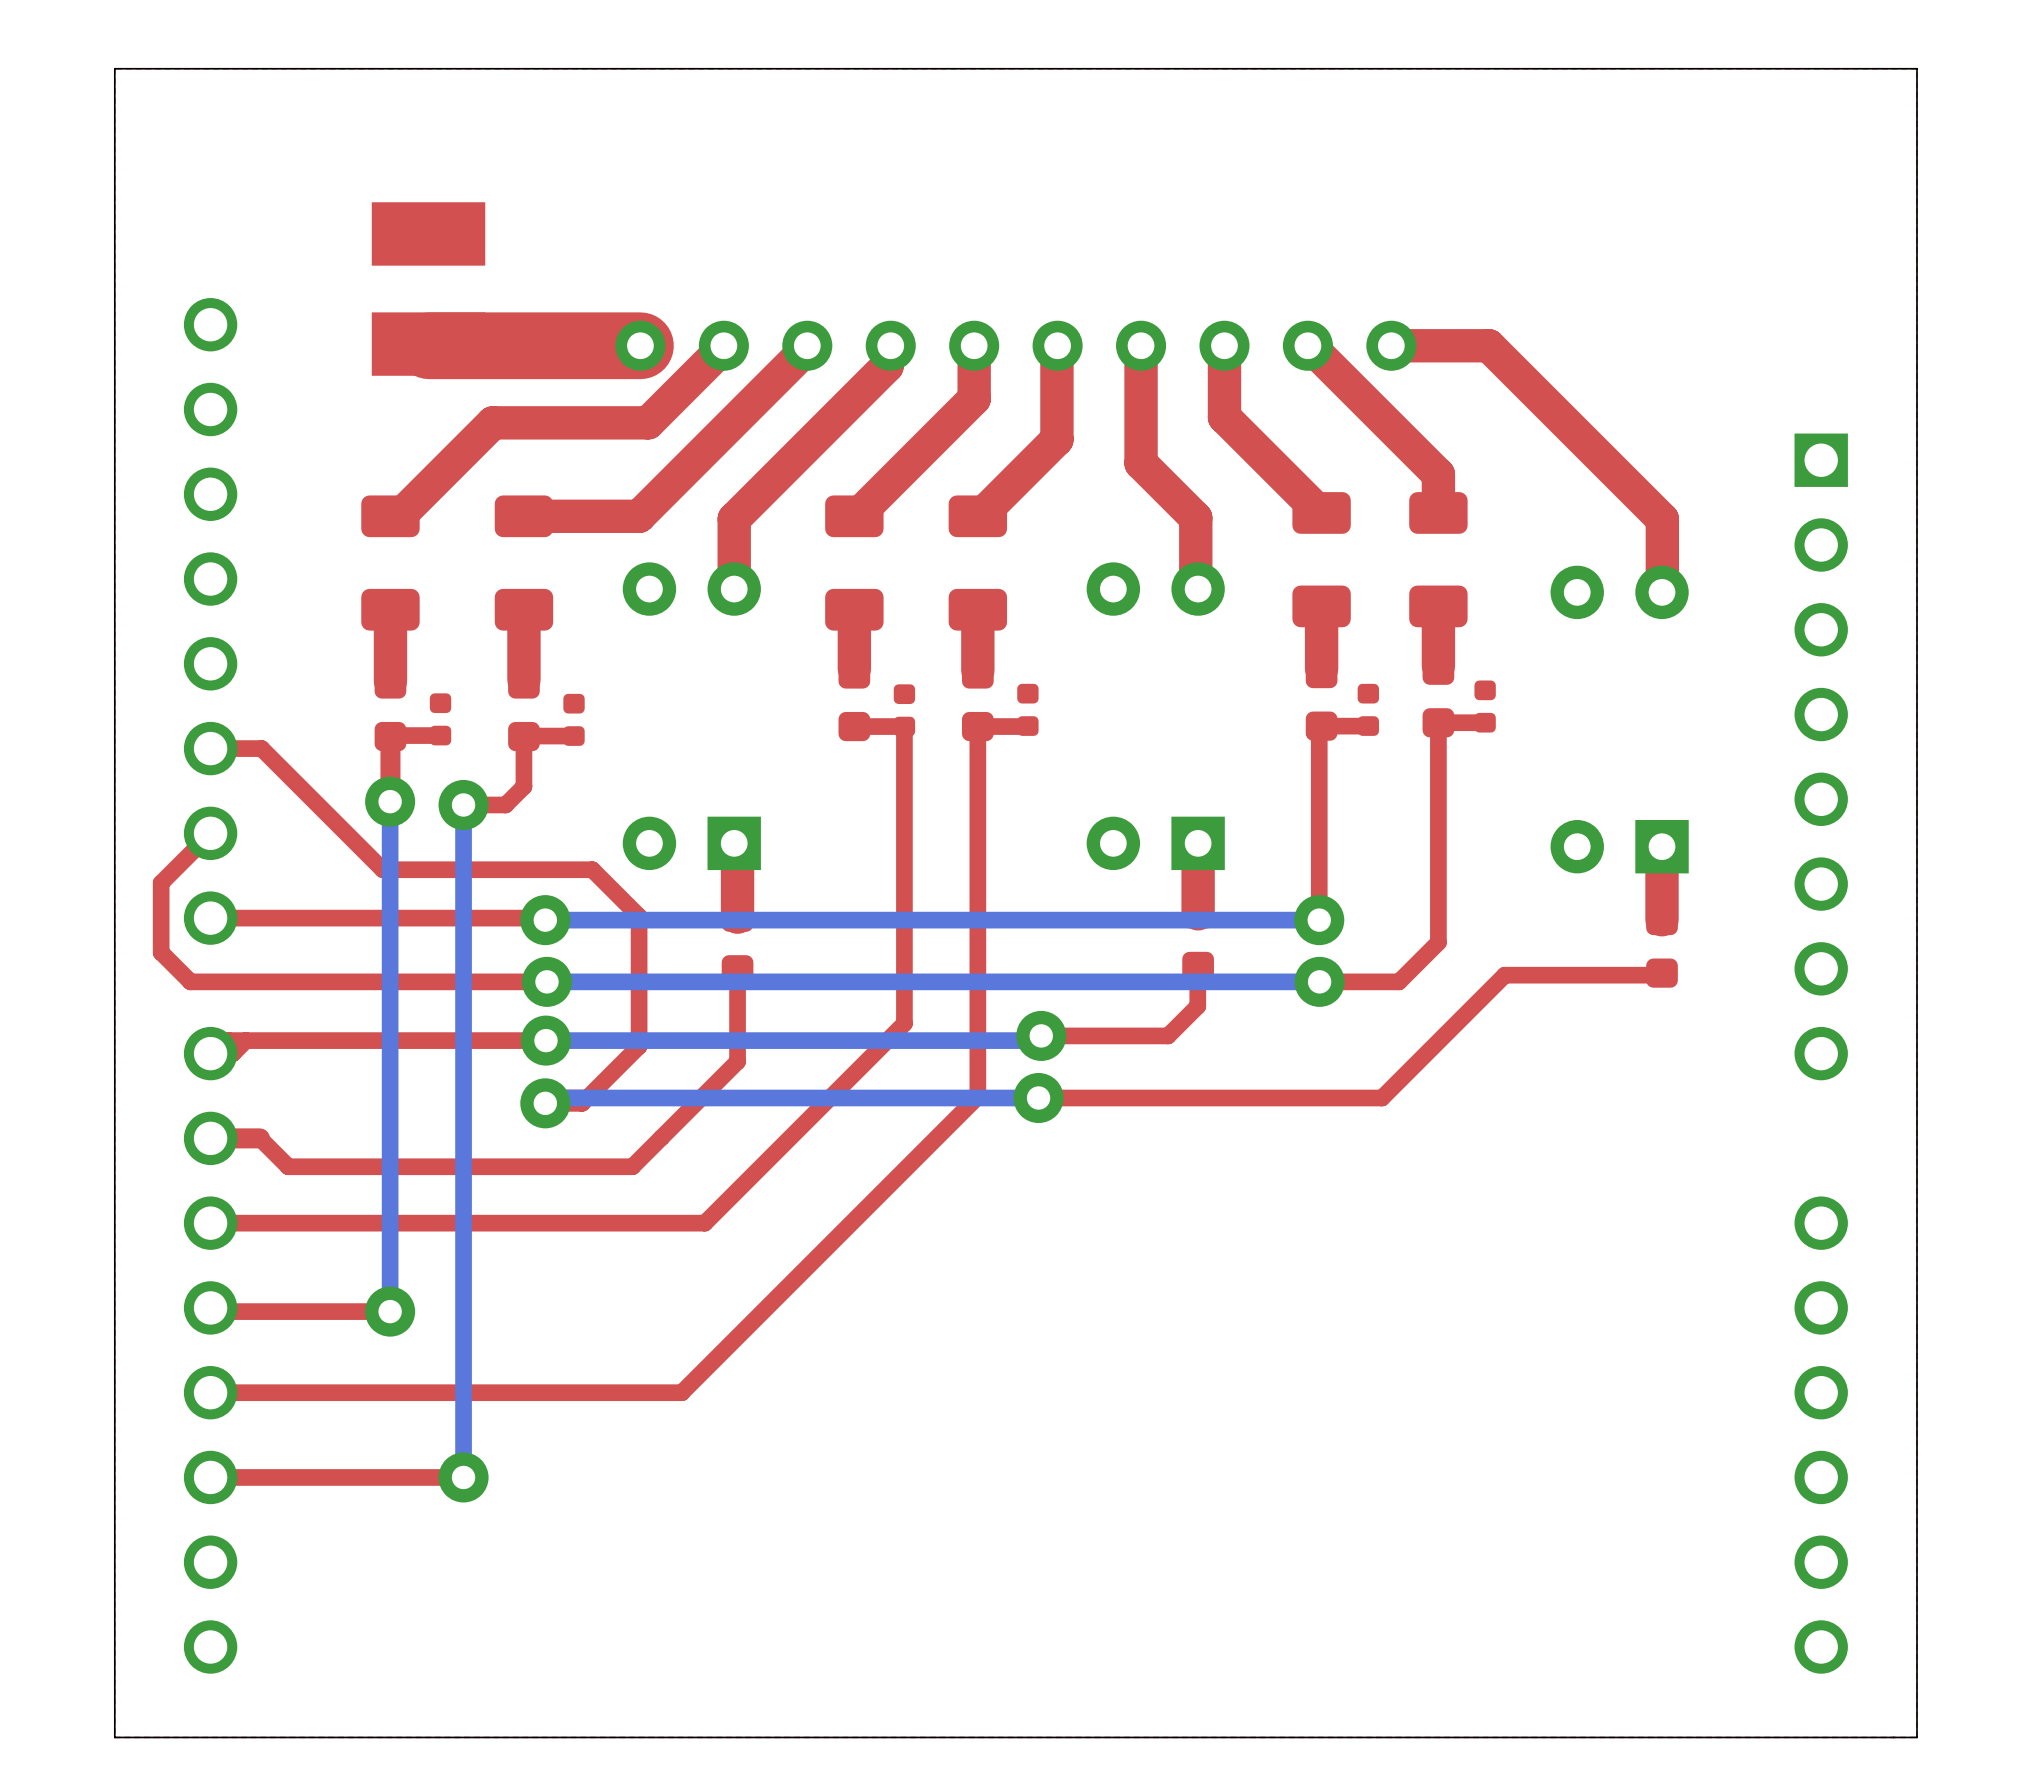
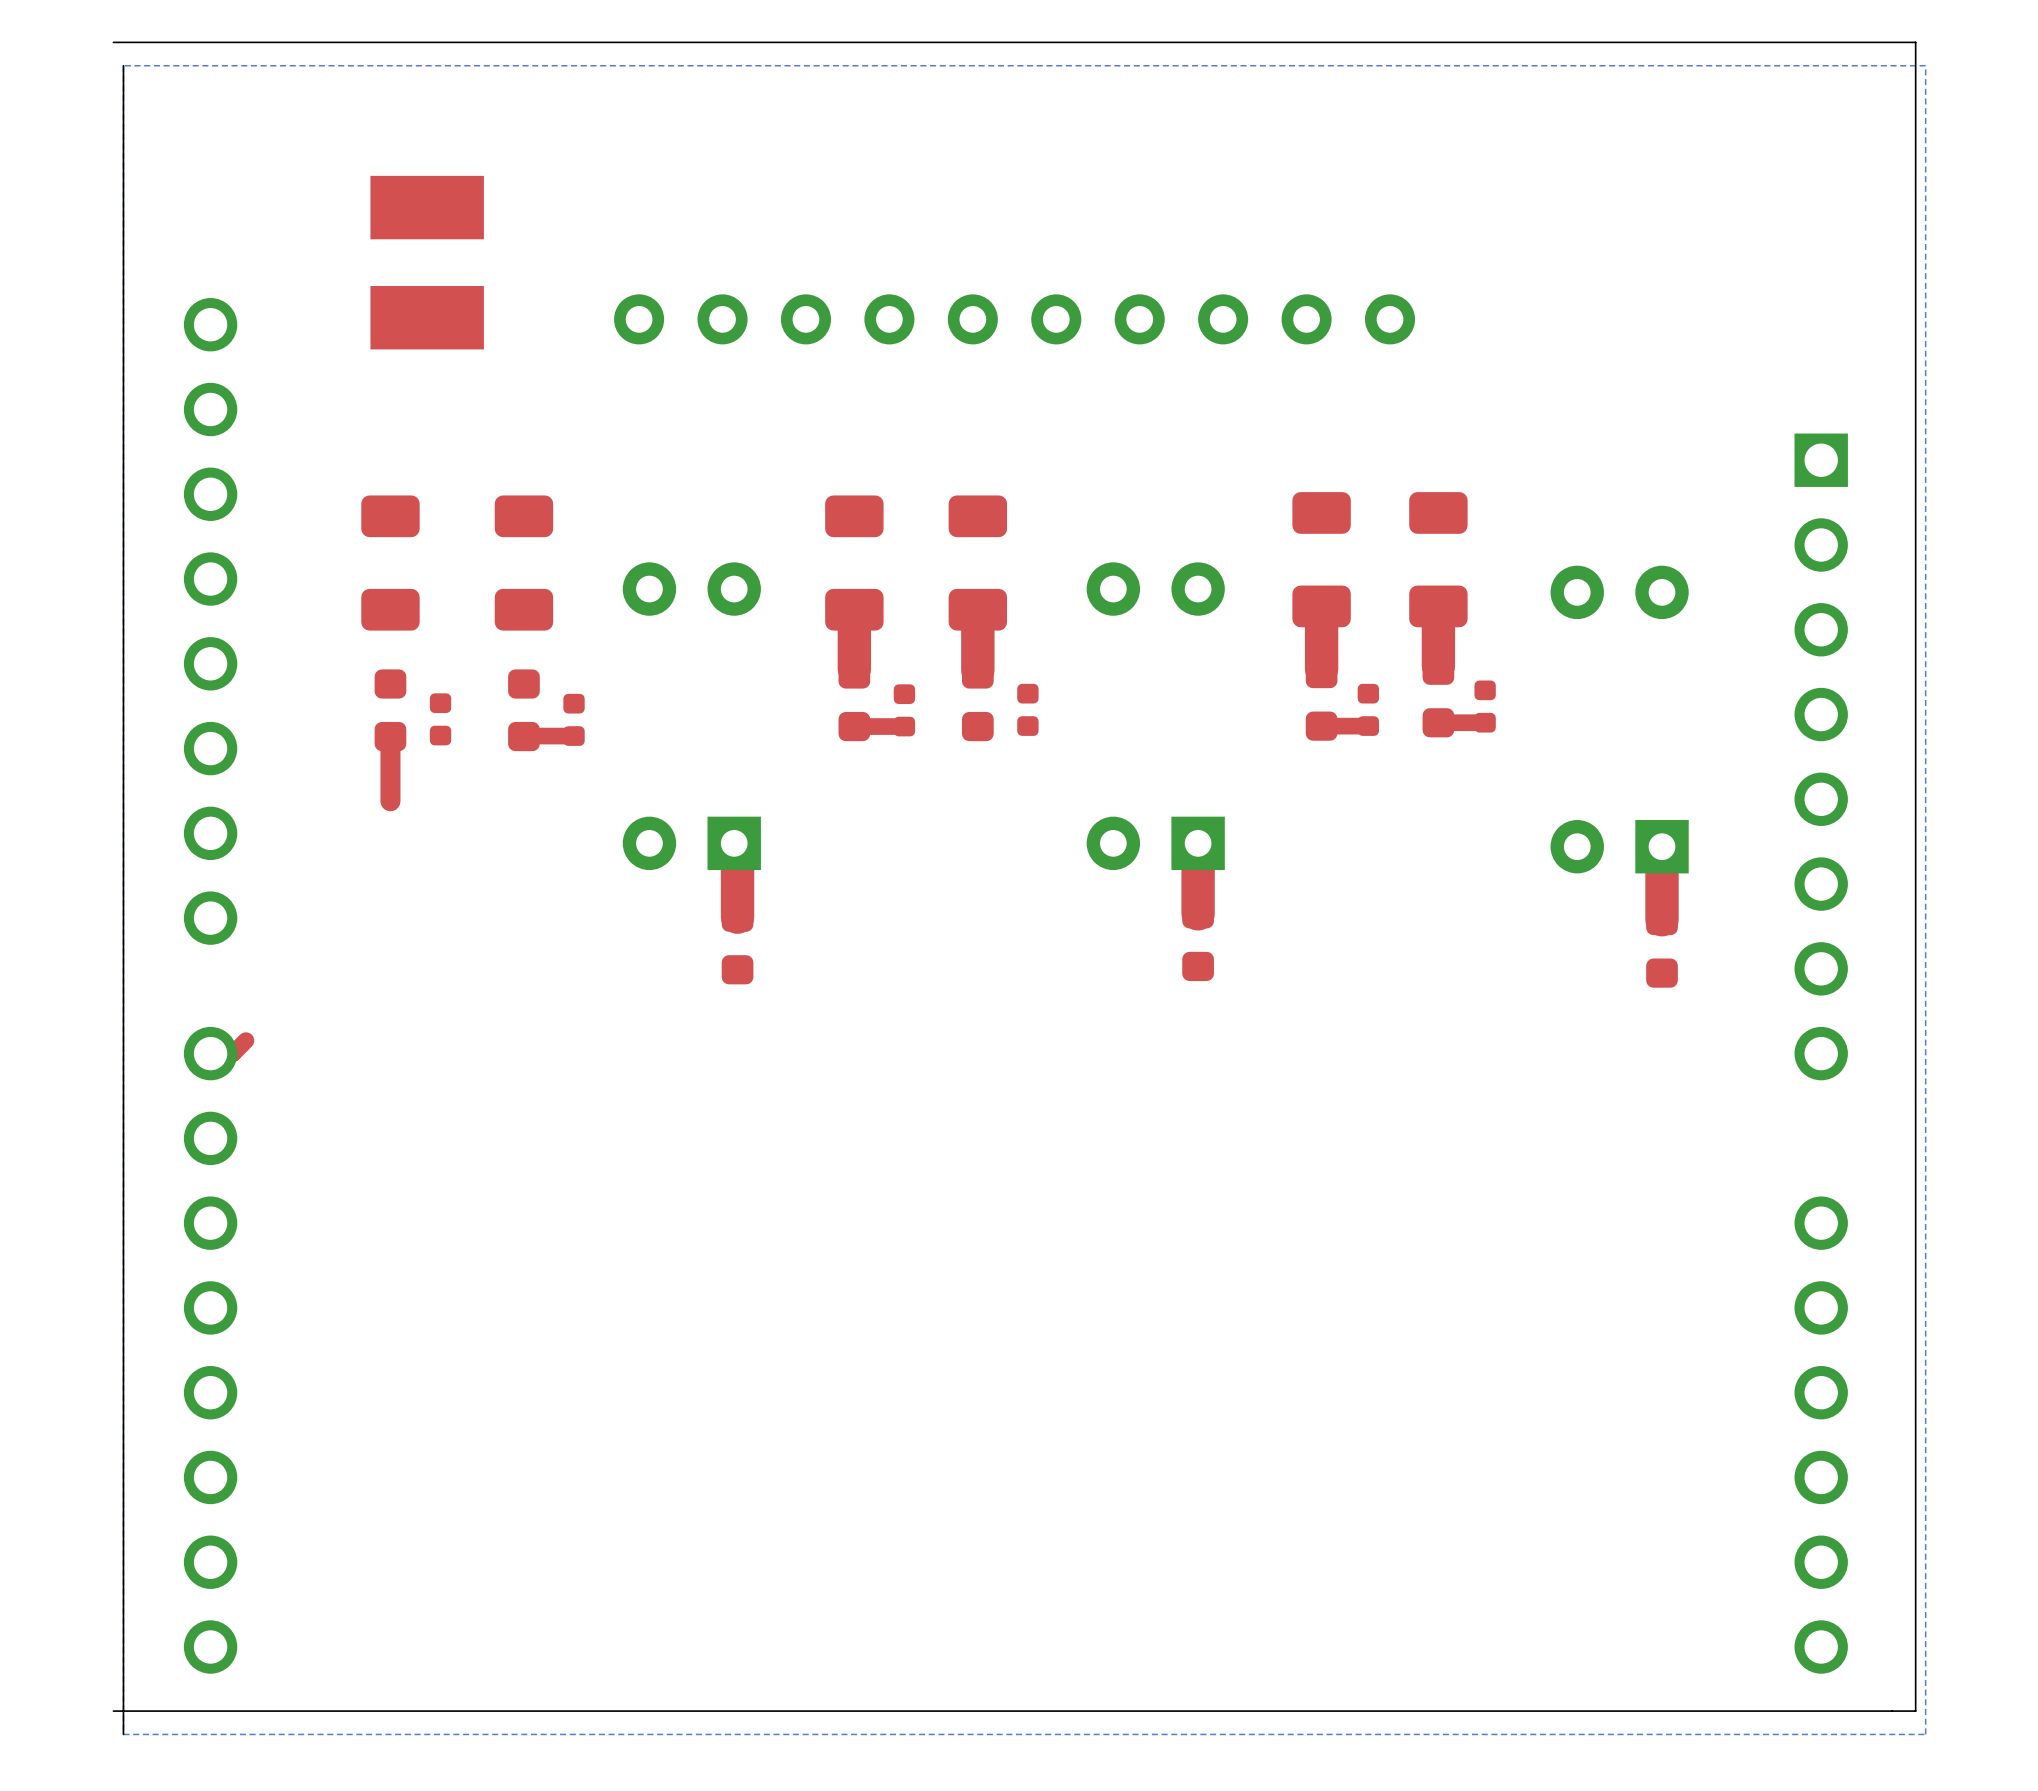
board edge: none -> (113, 42) (1915, 42) (1915, 1711) (113, 1711)
board edge: none -> (123, 65) (123, 1734)
bottom zone outline: none -> (1925, 65) (1925, 1734) (123, 1734) (123, 65) (1925, 65)
board edge: (1916, 68) (1916, 1737) (114, 1737) (114, 68) (1916, 68) -> none
part position: (428, 289) -> (427, 262)
top track: (640, 345) (429, 345) -> none
top track: (723, 345) (648, 422) (492, 422) (403, 511) -> none
part position: (1015, 345) -> (1014, 319)
top track: (1056, 345) (1056, 439) (980, 516) (977, 516) -> none
top track: (1141, 345) (1141, 463) (1195, 517) (1195, 587) -> none
top track: (1224, 345) (1224, 417) (1321, 512) -> none
top track: (1309, 345) (1438, 474) (1438, 512) -> none
top track: (1391, 345) (1488, 345) (1662, 519) (1662, 591) -> none
top track: (808, 347) (639, 516) (523, 516) -> none
top track: (887, 348) (887, 366) (734, 518) (734, 589) -> none
top track: (974, 348) (974, 398) (856, 516) (854, 516) -> none
top track: (390, 609) (390, 681) -> none
top track: (523, 609) (523, 679) -> none
top track: (1438, 722) (1438, 942) (1399, 981) (1319, 981) -> none
top track: (904, 726) (904, 1023) (704, 1223) (210, 1223) -> none
top track: (1028, 726) (977, 726) (978, 1096) (681, 1392) (210, 1392) -> none
top track: (1319, 727) (1319, 920) -> none
top track: (440, 735) (392, 735) -> none
top track: (523, 736) (523, 786) (505, 804) (463, 804) -> none
top track: (210, 748) (261, 748) (382, 869) (592, 869) (639, 916) (639, 1046) (582, 1103) (545, 1103) -> none
bottom track: (390, 801) (390, 1311) -> none
via: (390, 801) -> none
bottom track: (463, 804) (463, 1477) -> none
via: (463, 804) -> none
top track: (210, 833) (161, 883) (161, 952) (190, 981) (546, 981) -> none
top track: (210, 918) (543, 918) (545, 920) -> none
via: (545, 920) -> none
via: (1319, 920) -> none
bottom track: (1320, 920) (545, 920) -> none
top track: (1197, 968) (1197, 1006) (1168, 1035) (1041, 1035) -> none
top track: (737, 969) (737, 1061) (632, 1166) (288, 1166) (259, 1138) (210, 1138) -> none
top track: (1660, 975) (1504, 975) (1382, 1098) (1038, 1098) -> none
via: (546, 981) -> none
bottom track: (1319, 981) (546, 981) -> none
via: (1319, 981) -> none
bottom track: (1041, 1035) (1036, 1040) (545, 1040) -> none
via: (1041, 1035) -> none
top track: (545, 1040) (228, 1040) (215, 1053) -> none
via: (545, 1040) -> none
bottom track: (1038, 1098) (544, 1098) -> none
via: (1038, 1098) -> none
via: (545, 1103) -> none
top track: (210, 1307) (212, 1311) (390, 1311) -> none
via: (390, 1311) -> none
top track: (463, 1477) (210, 1477) -> none
via: (463, 1477) -> none

